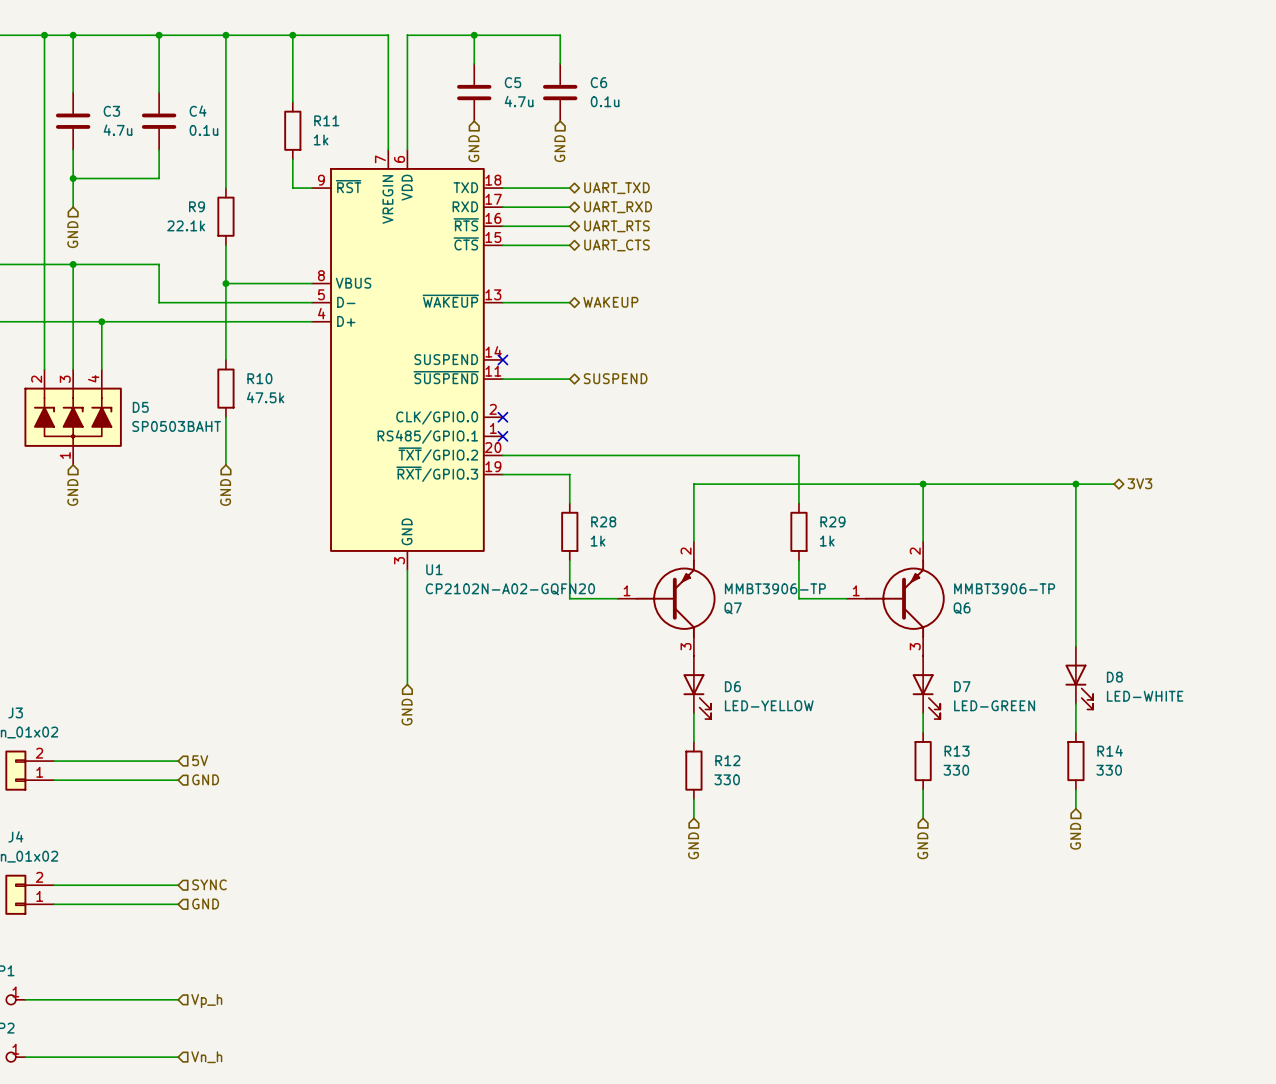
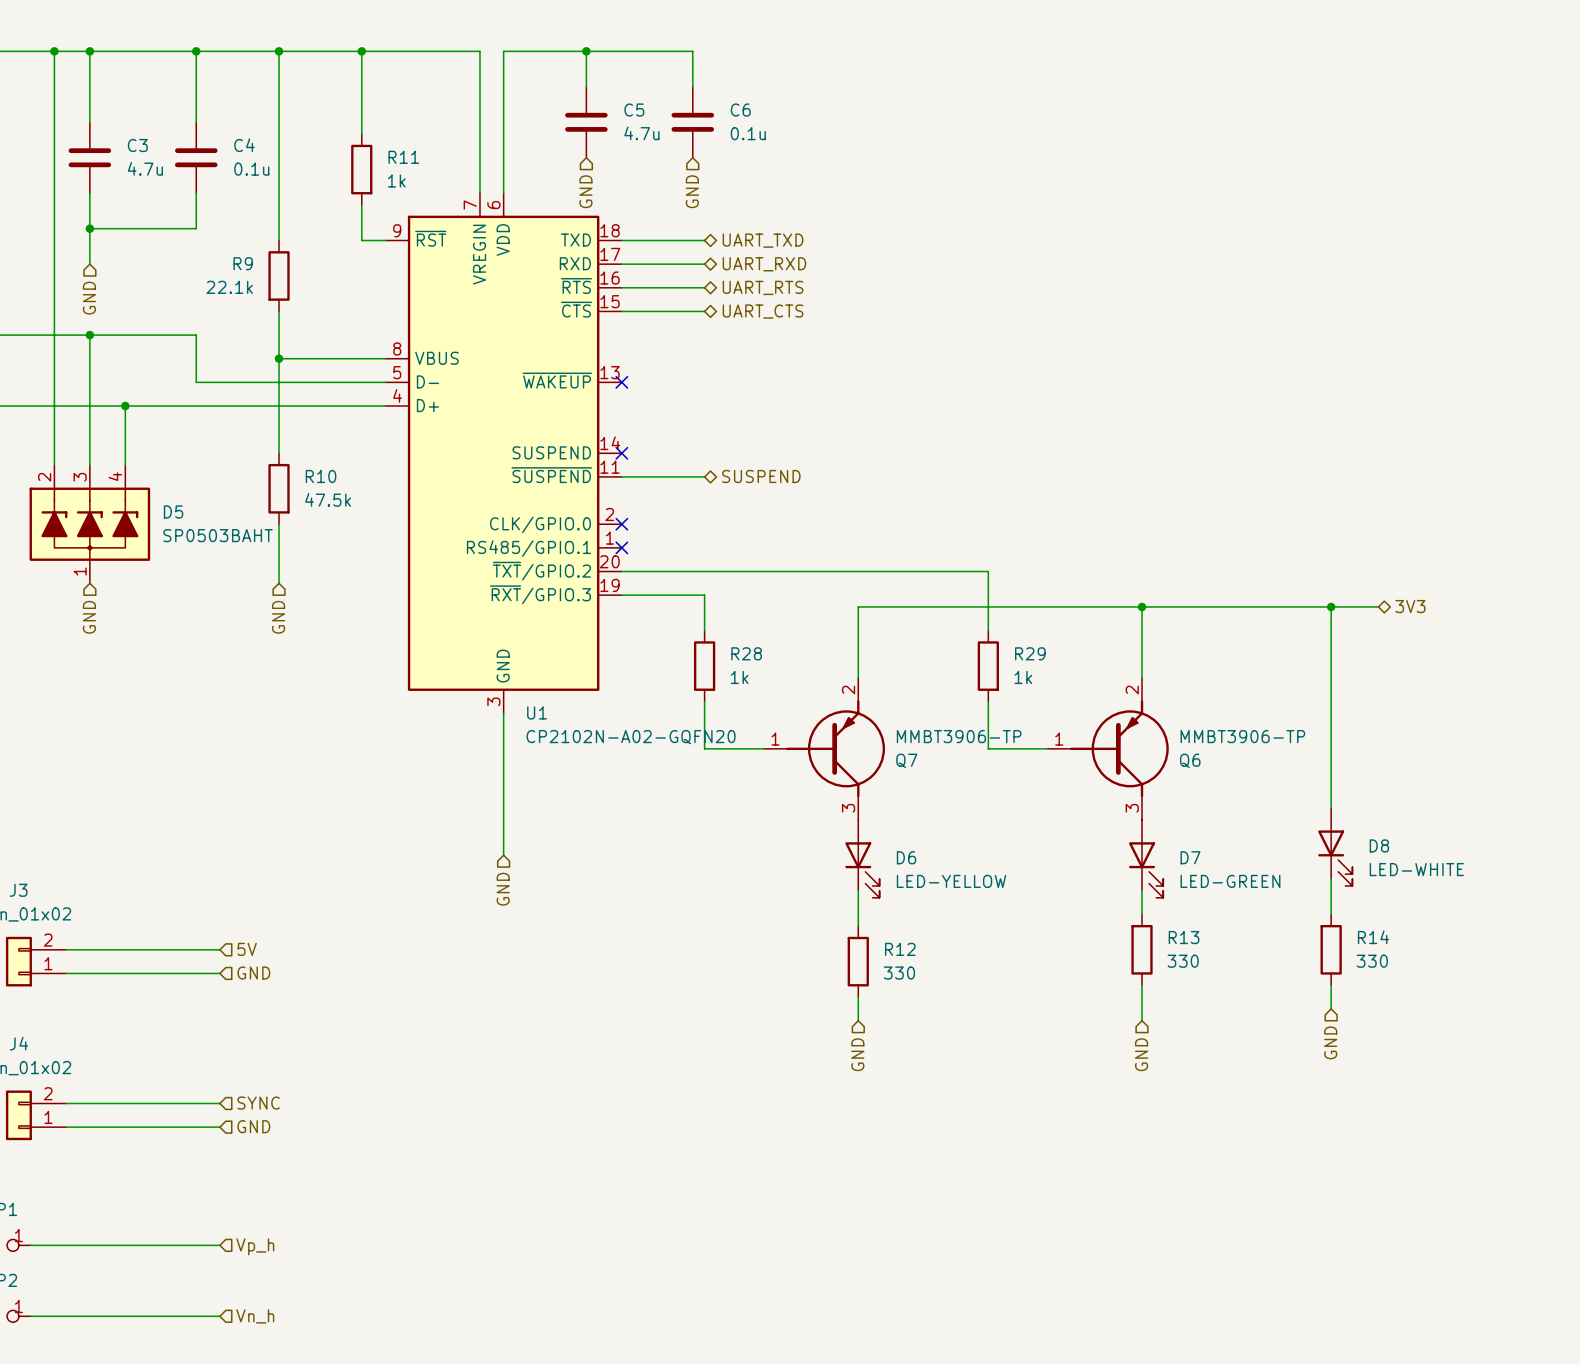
wire: (502, 302) (569, 302) -> none
no-connect mark: none -> (621, 382)
hierarchical label: WAKEUP (610, 302) -> none

